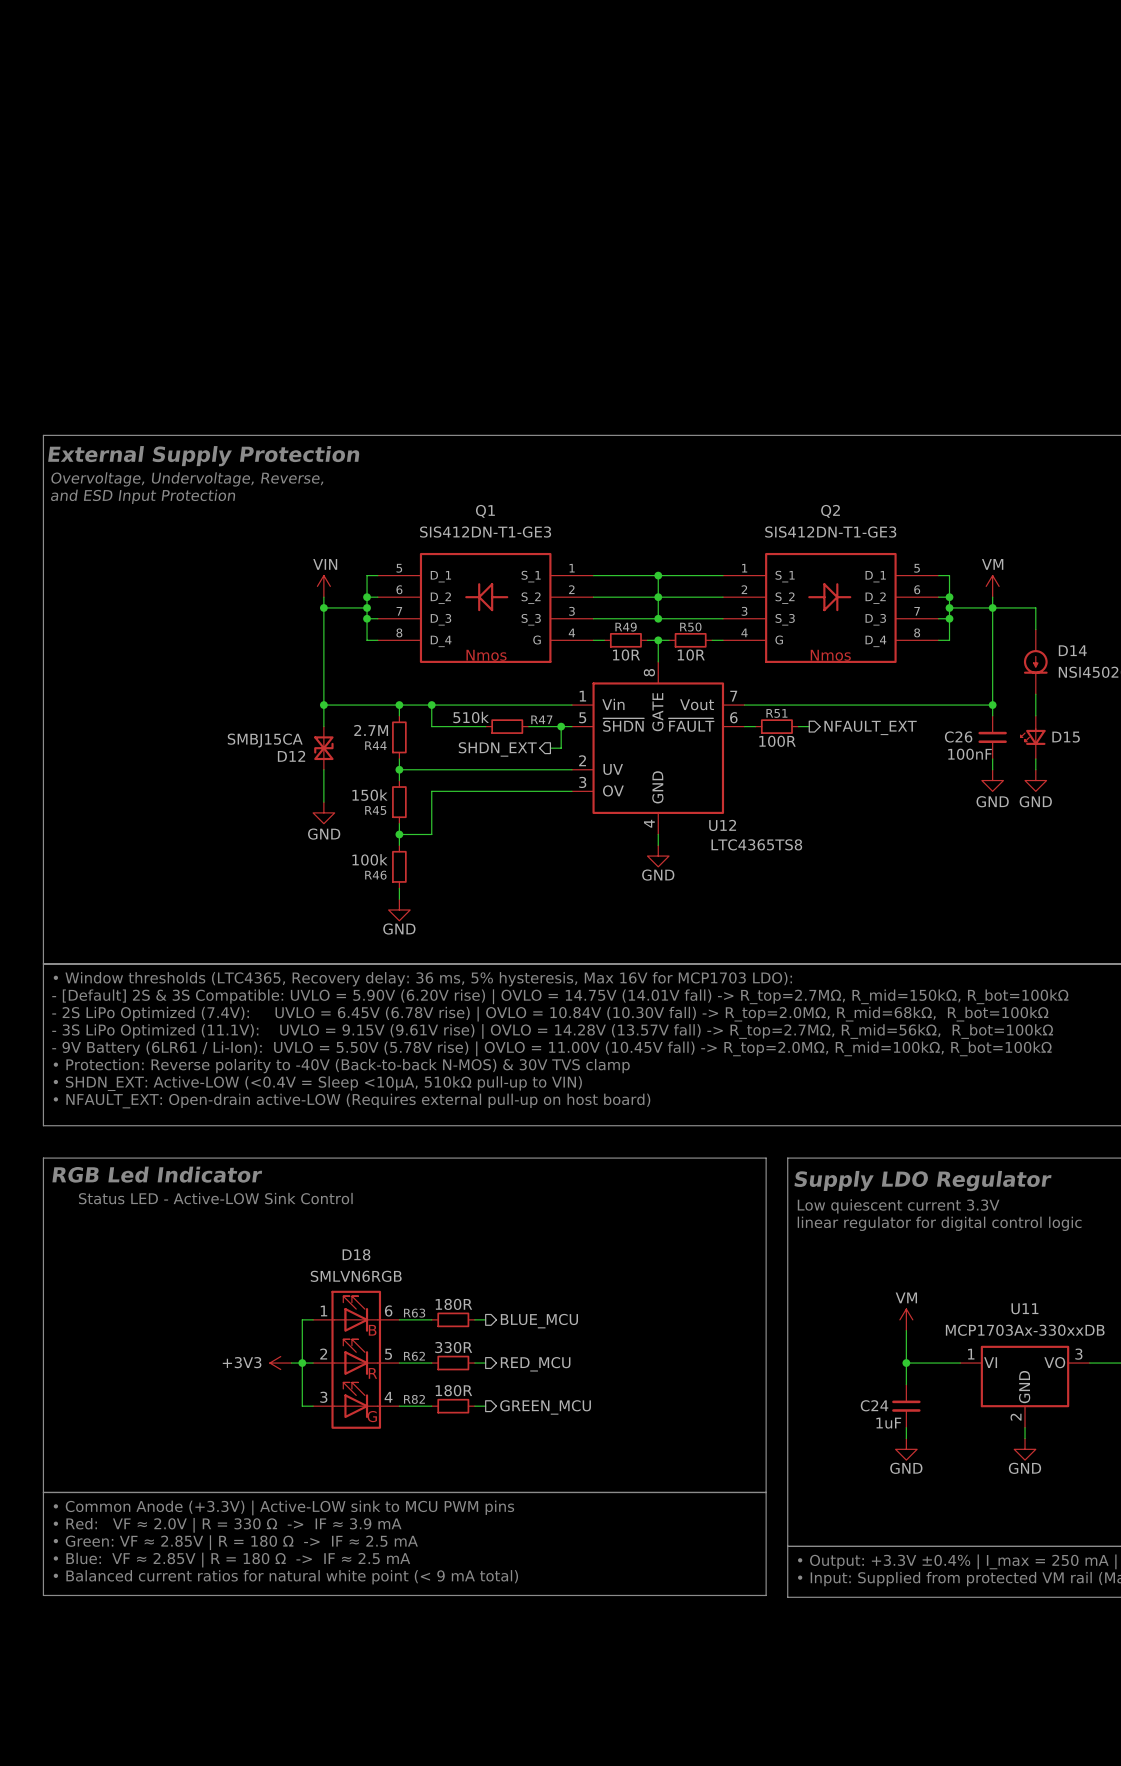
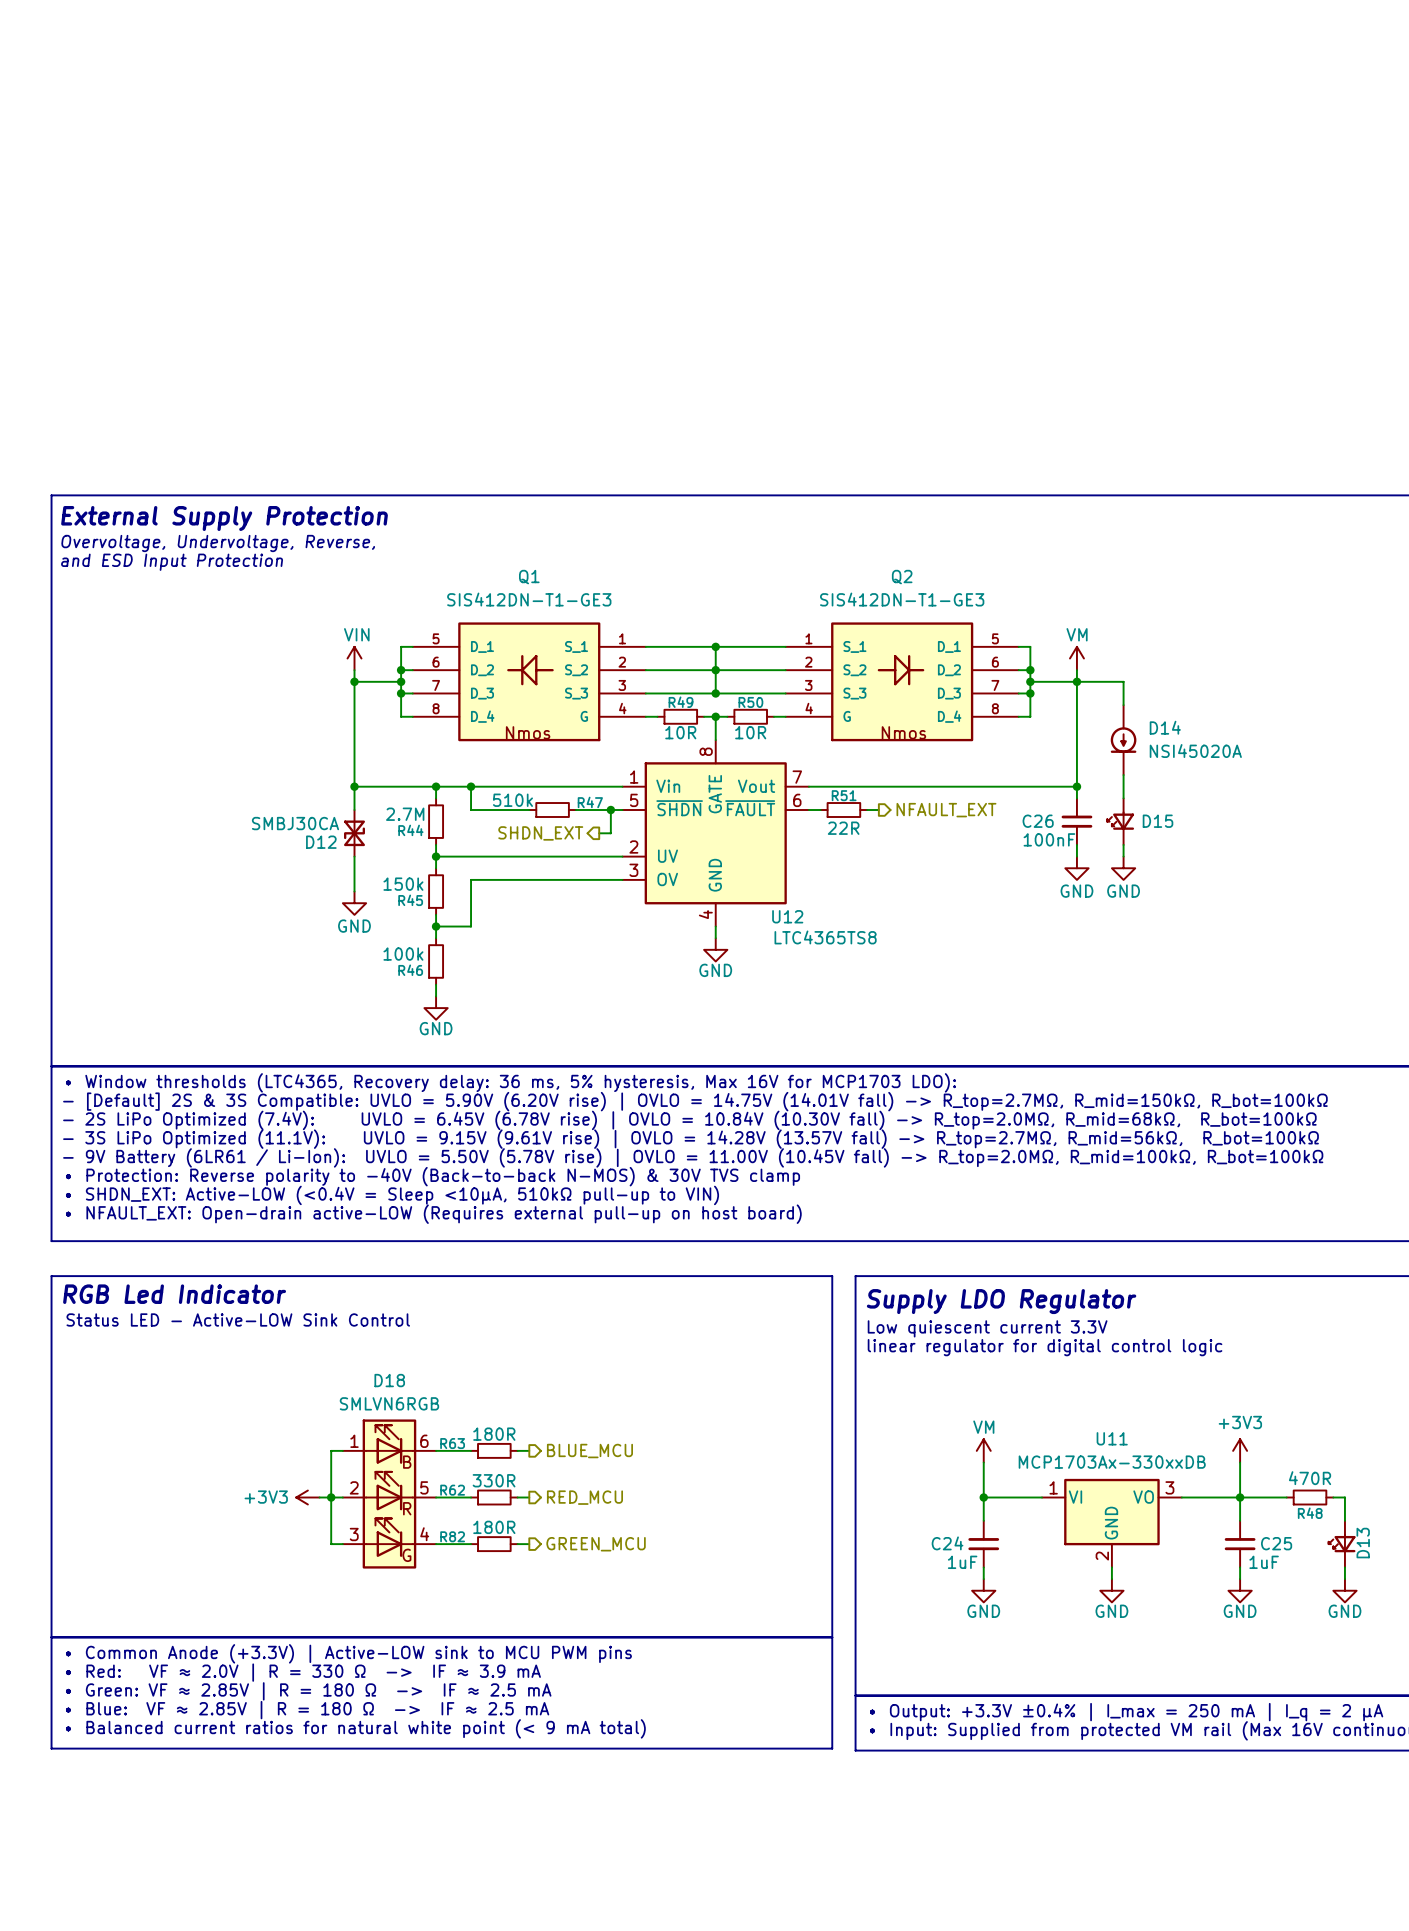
D12 value: SMBJ15CA (265, 740) -> SMBJ30CA (295, 823)
R51 value: 100R (777, 741) -> 22R (843, 828)

